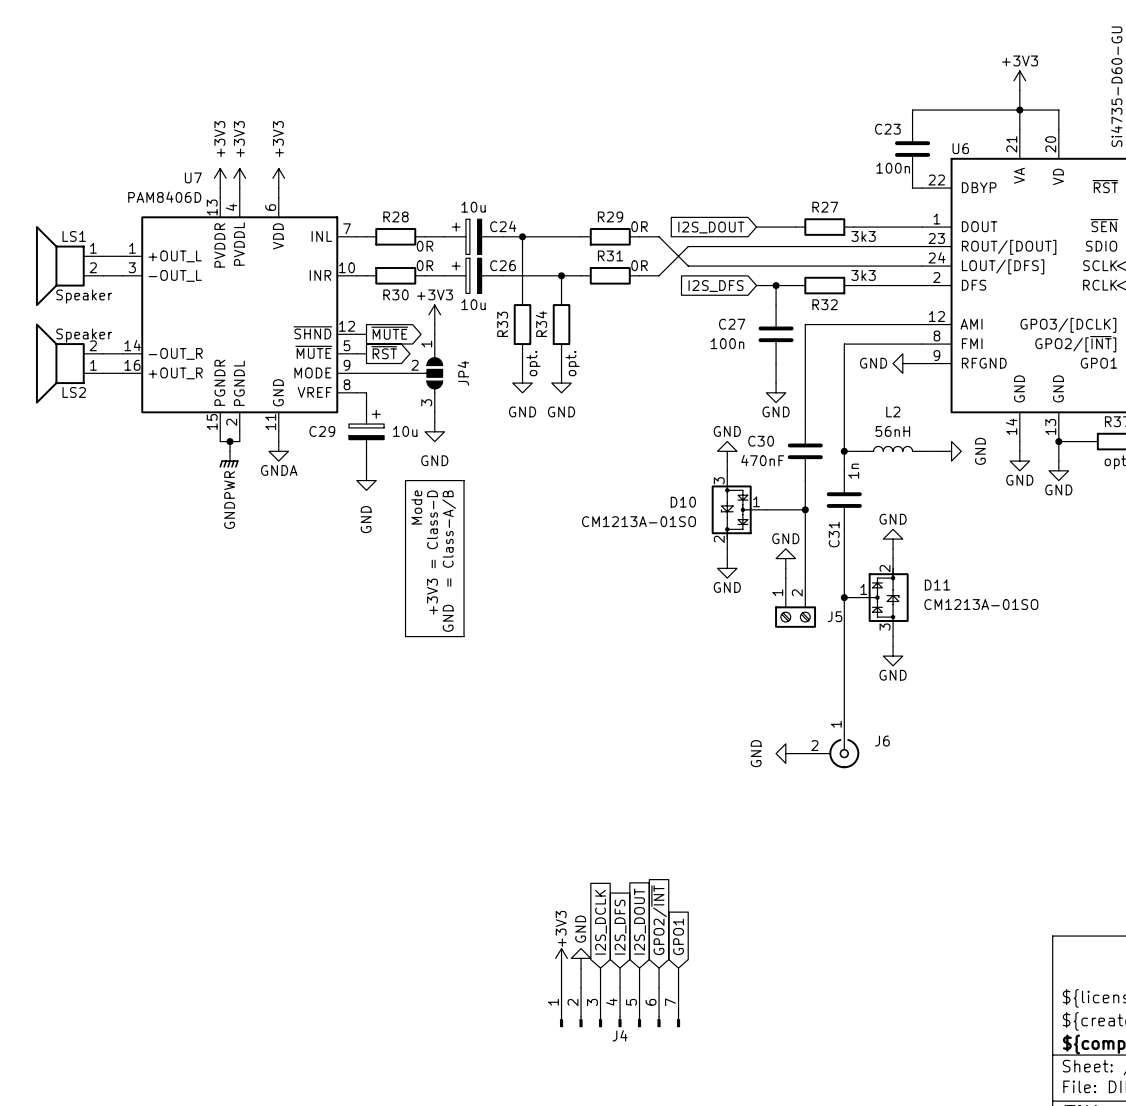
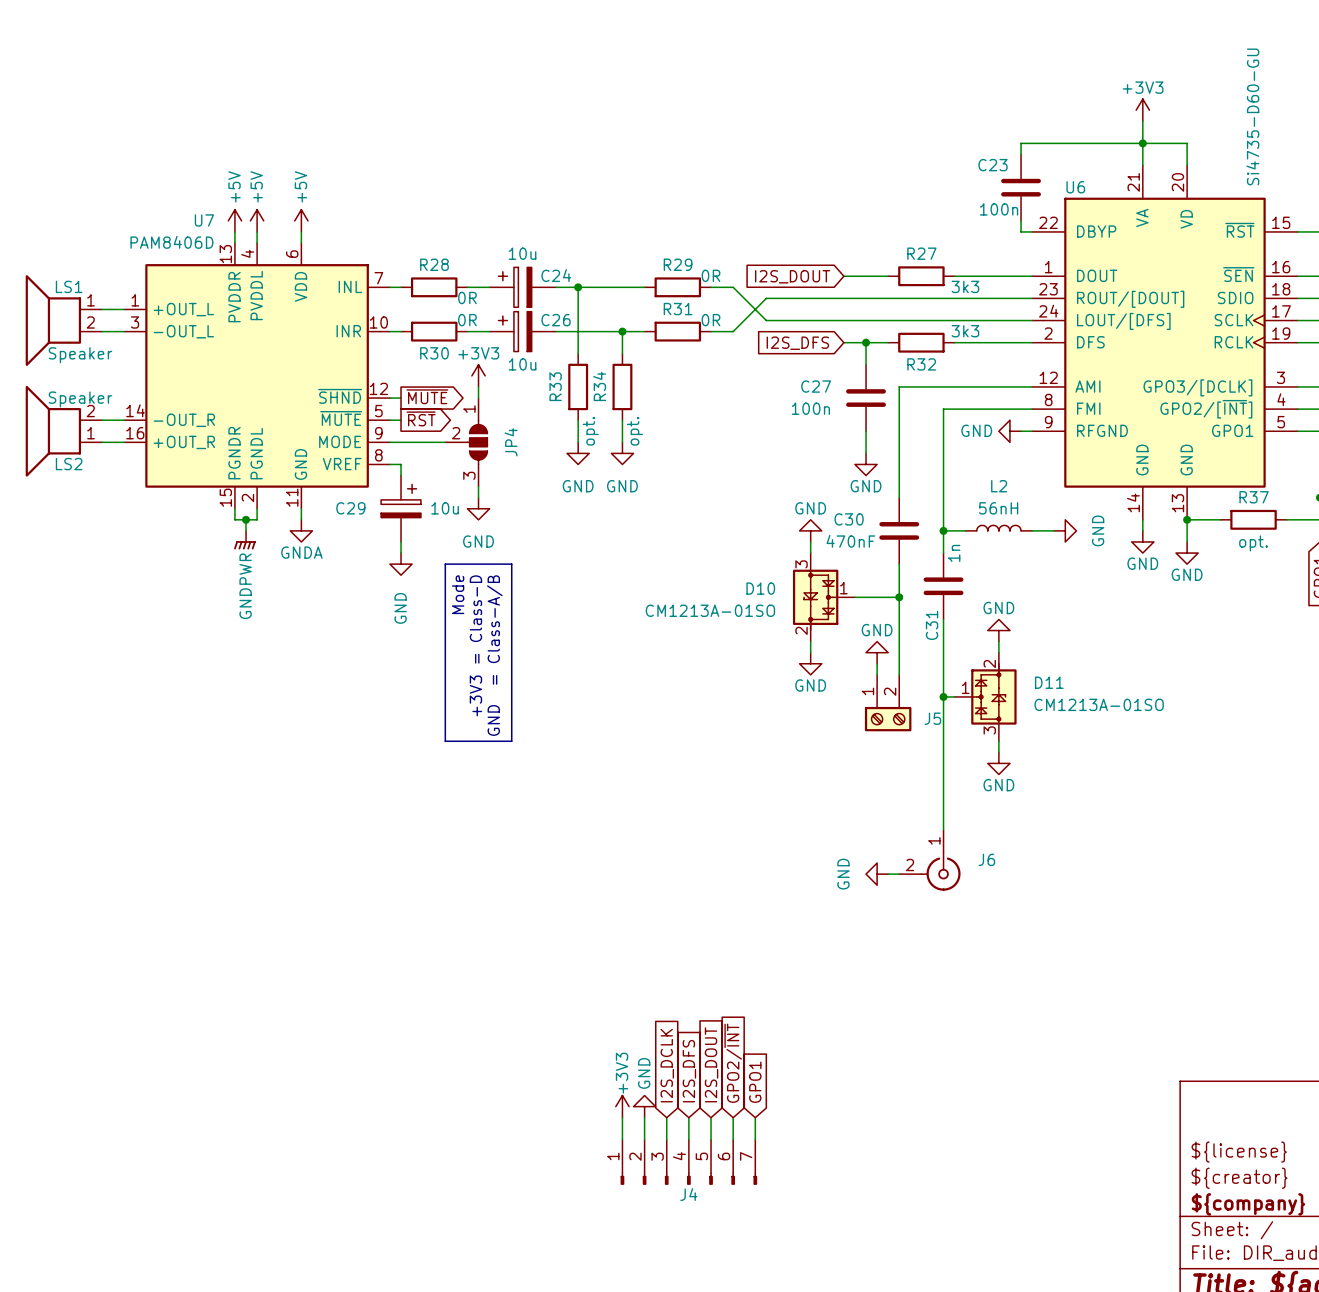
power symbol: +3V3 (220, 178) -> +5V (234, 220)
power symbol: +3V3 (239, 178) -> +5V (257, 220)
power symbol: +3V3 (278, 178) -> +5V (301, 220)

